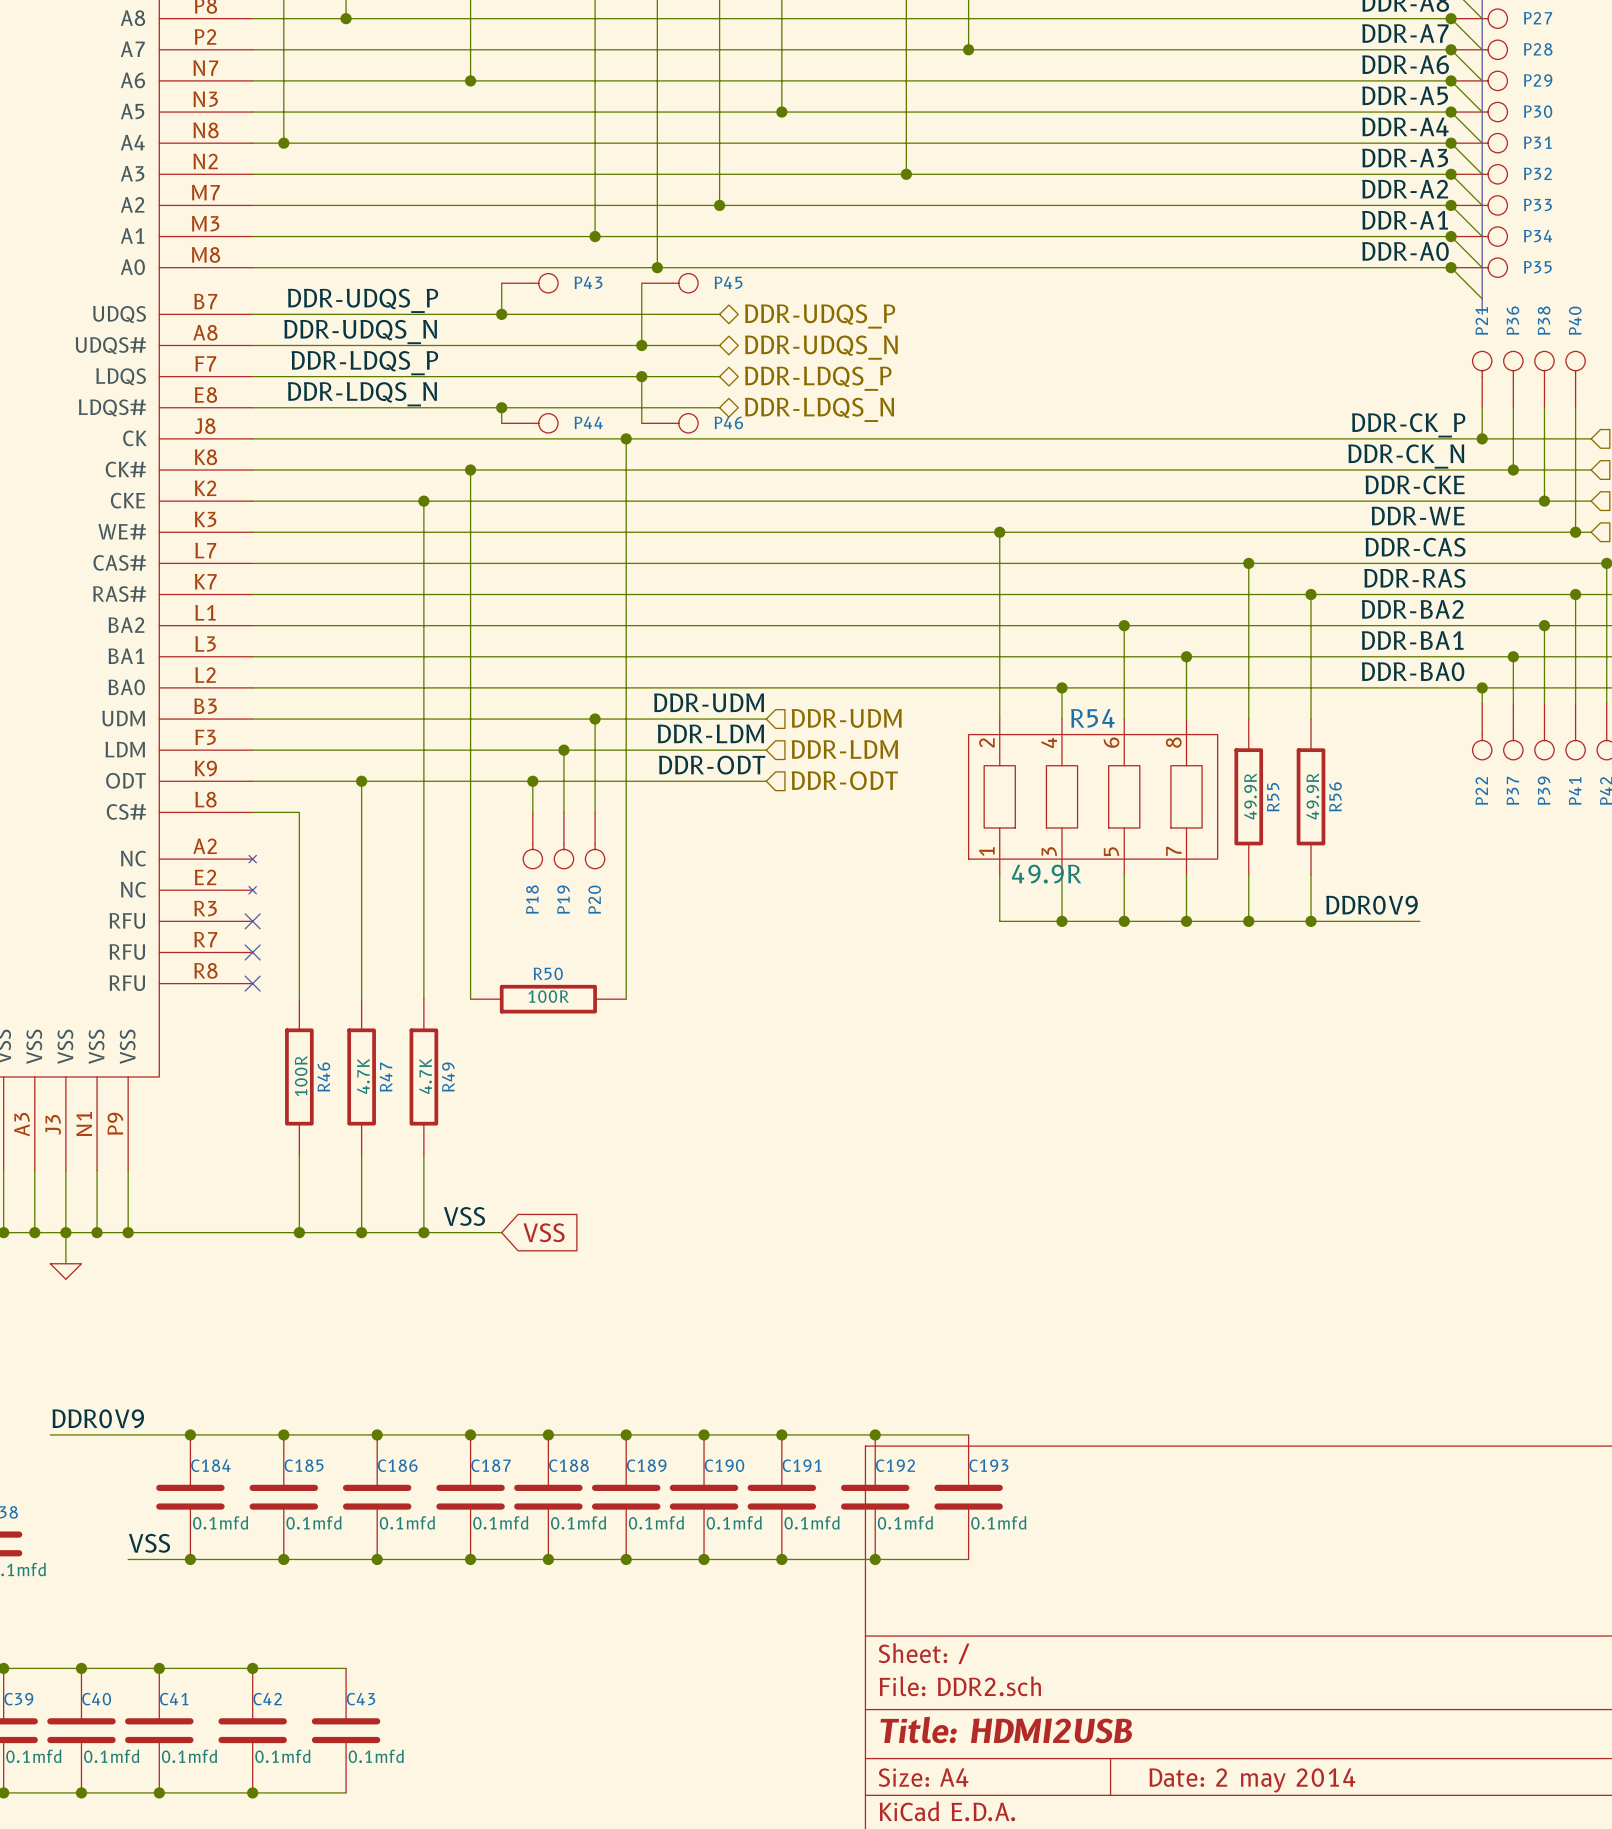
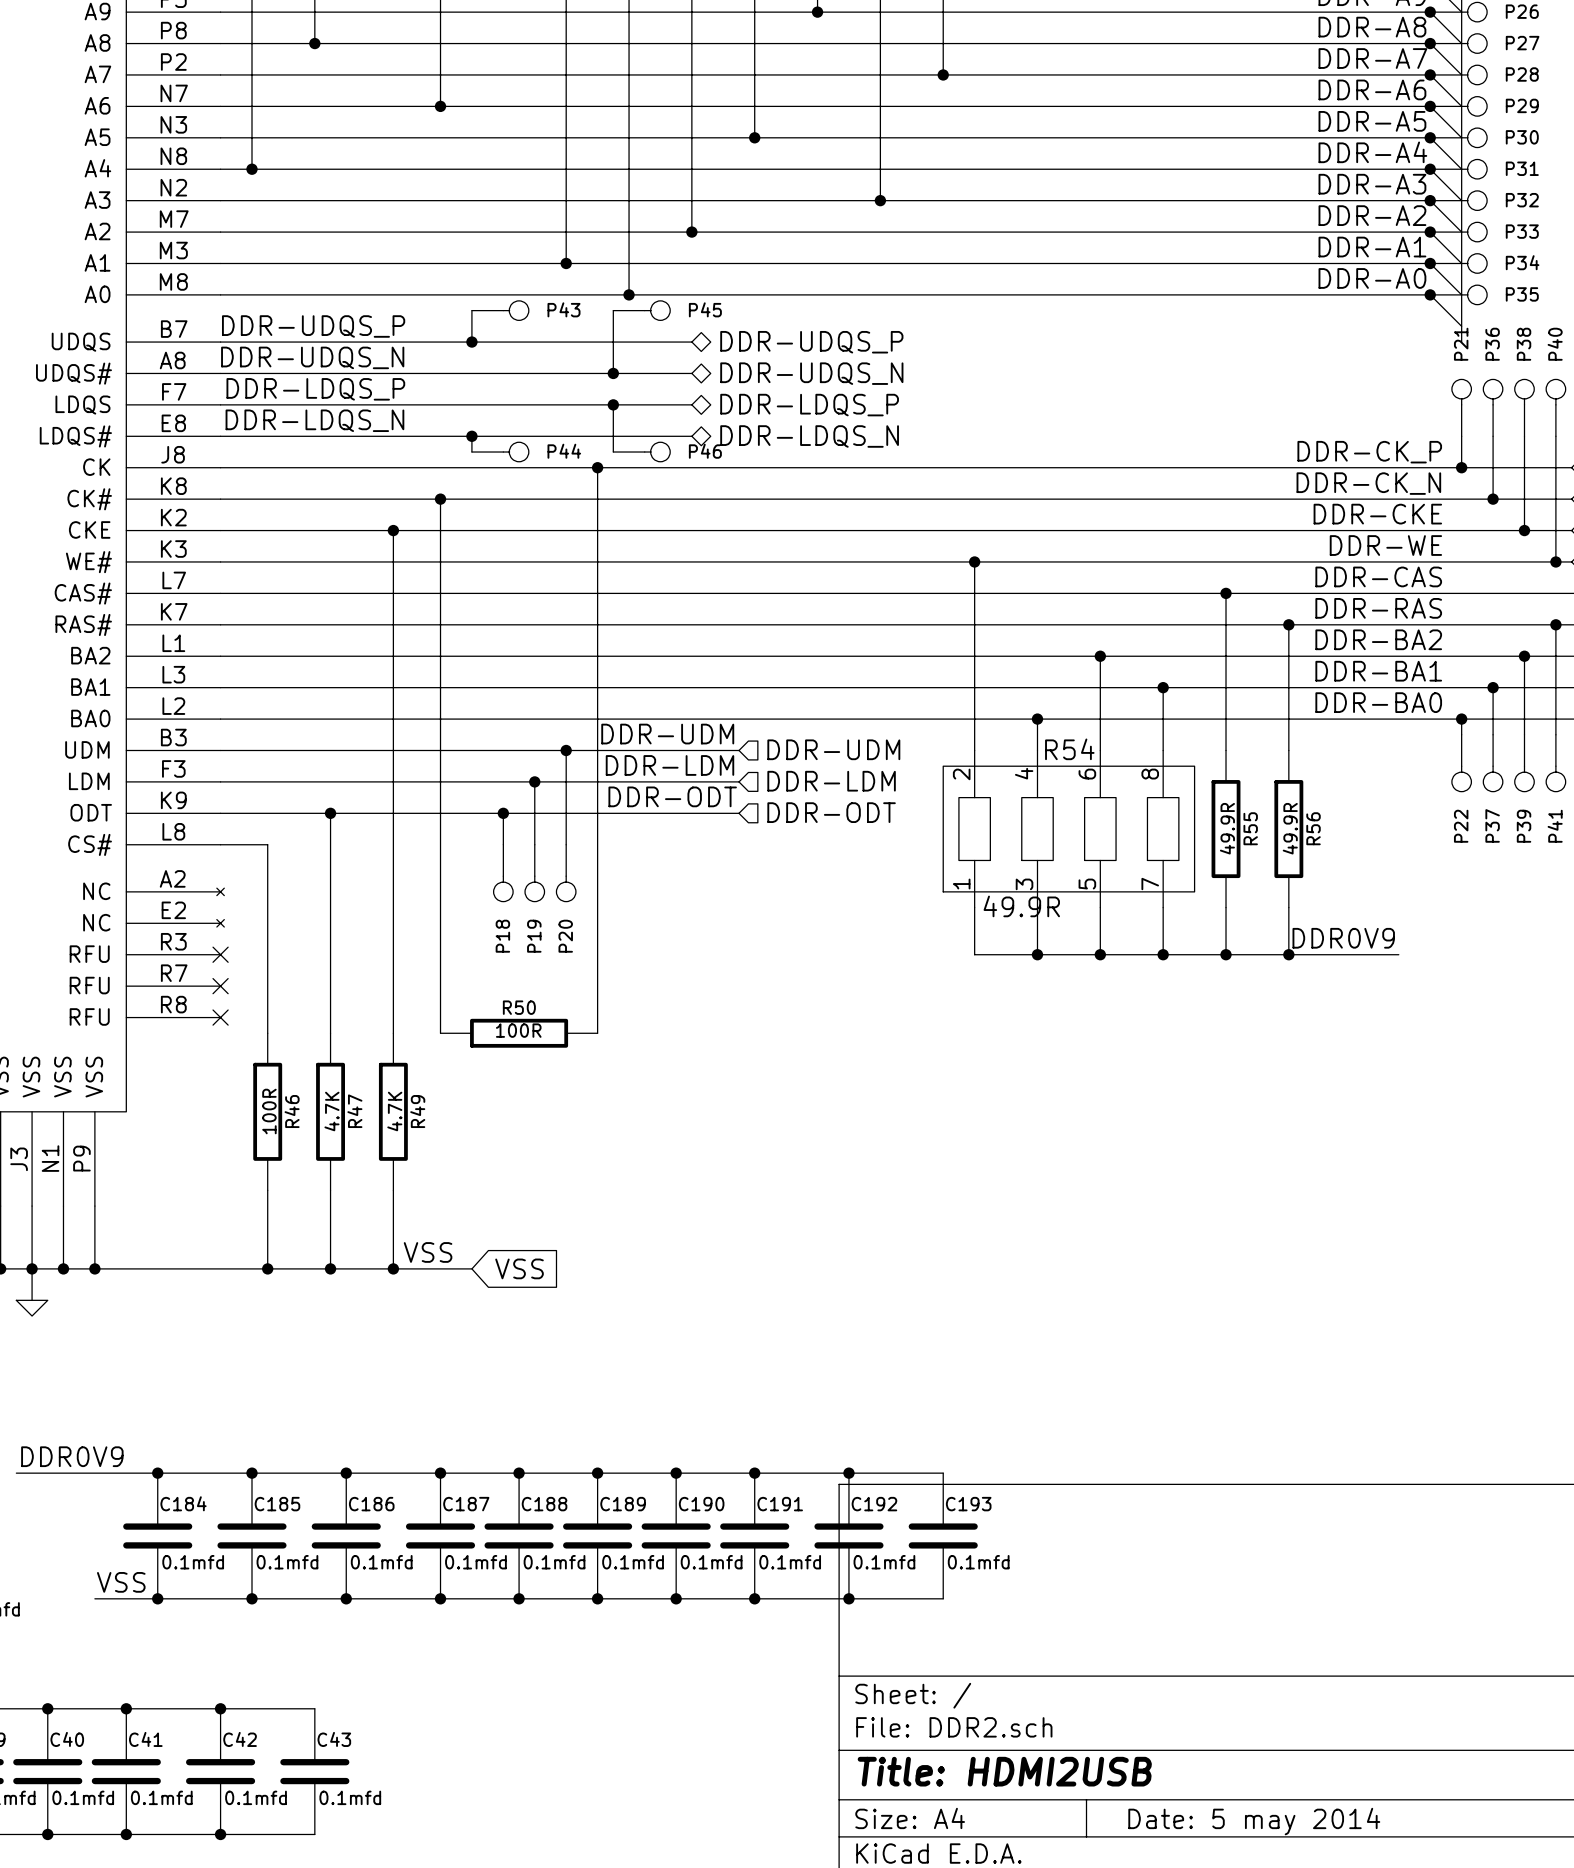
title block: Date: 2 may 2014 (1252, 1780) -> Date: 5 may 2014 (1254, 1821)

